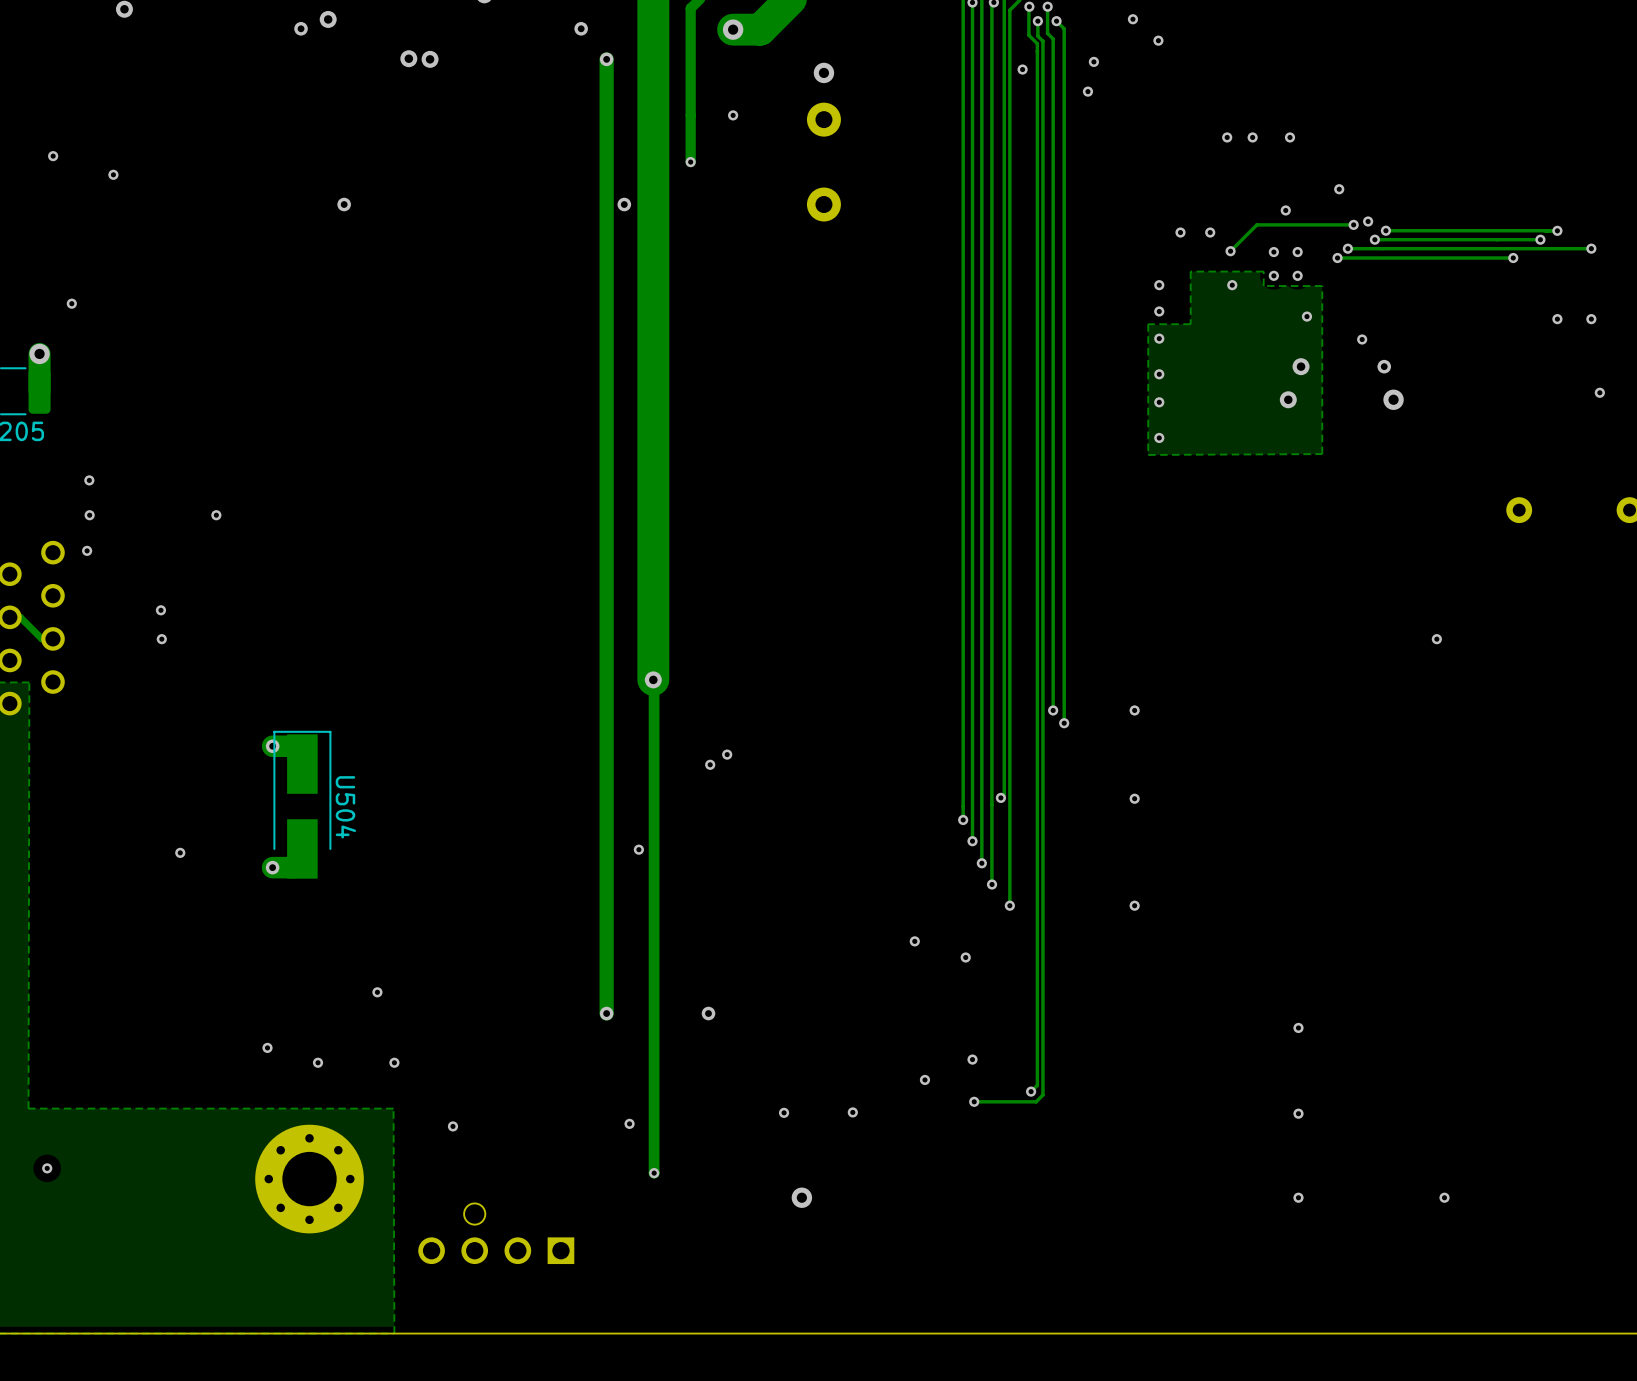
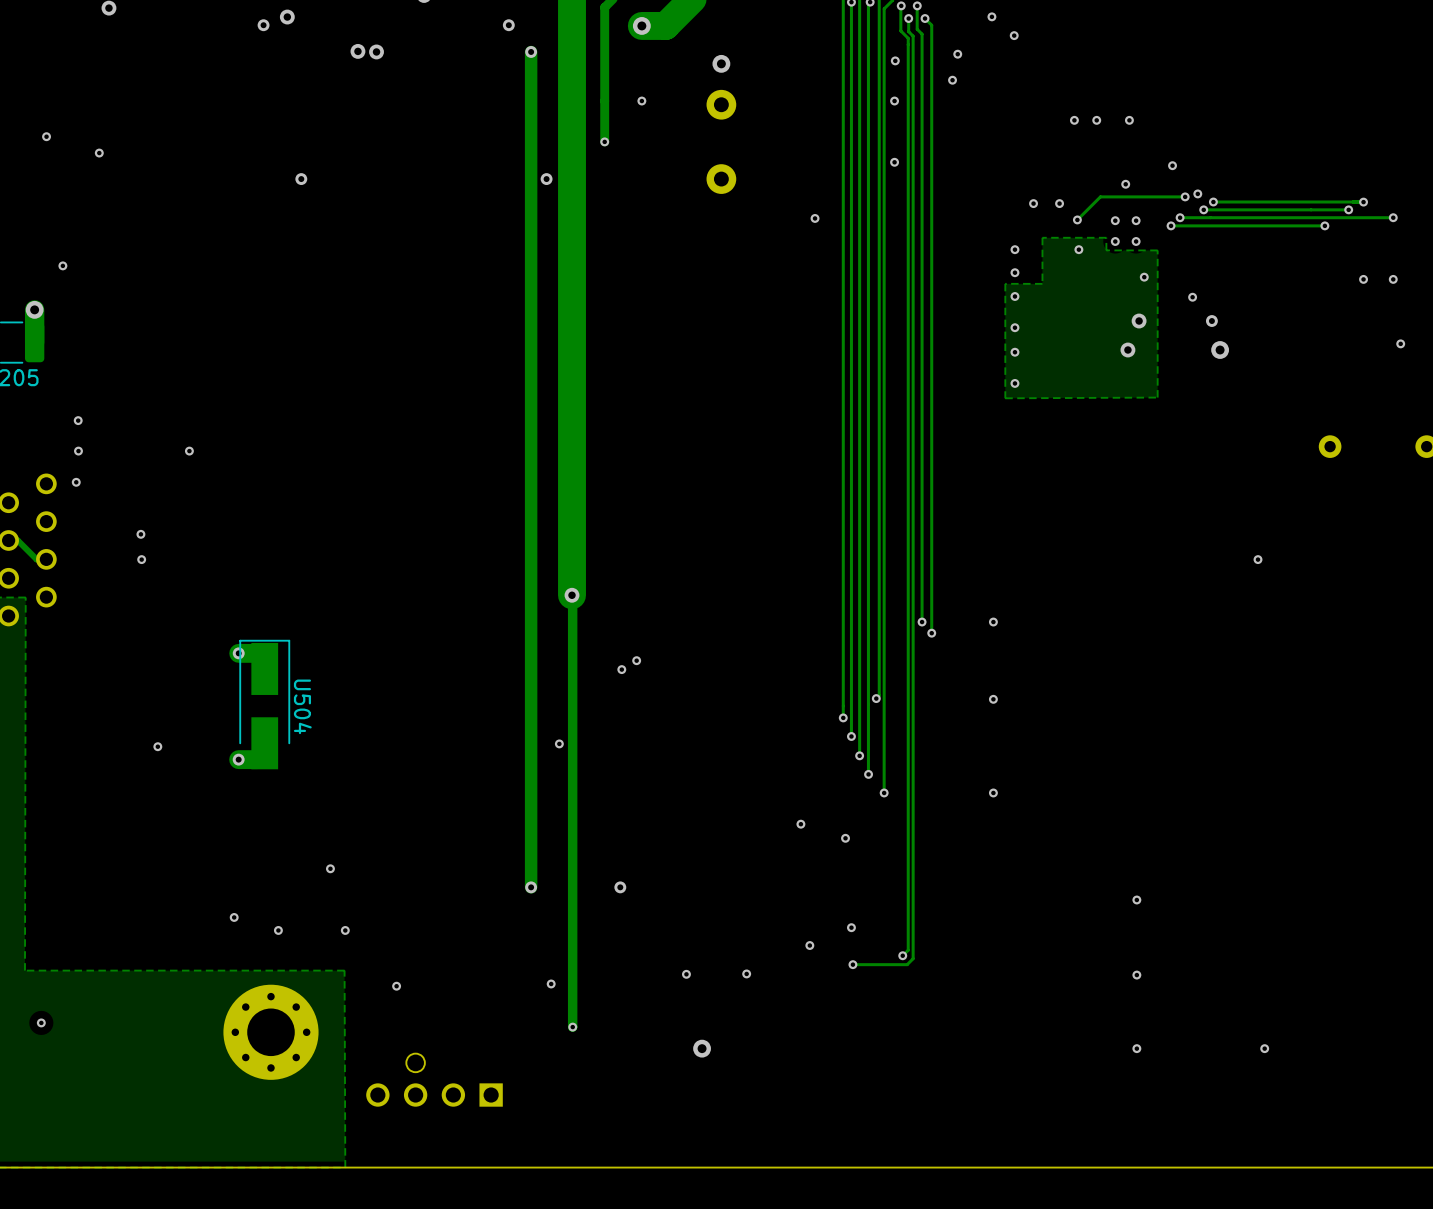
via: none -> (894, 101)
via: none -> (894, 162)
via: none -> (815, 218)

